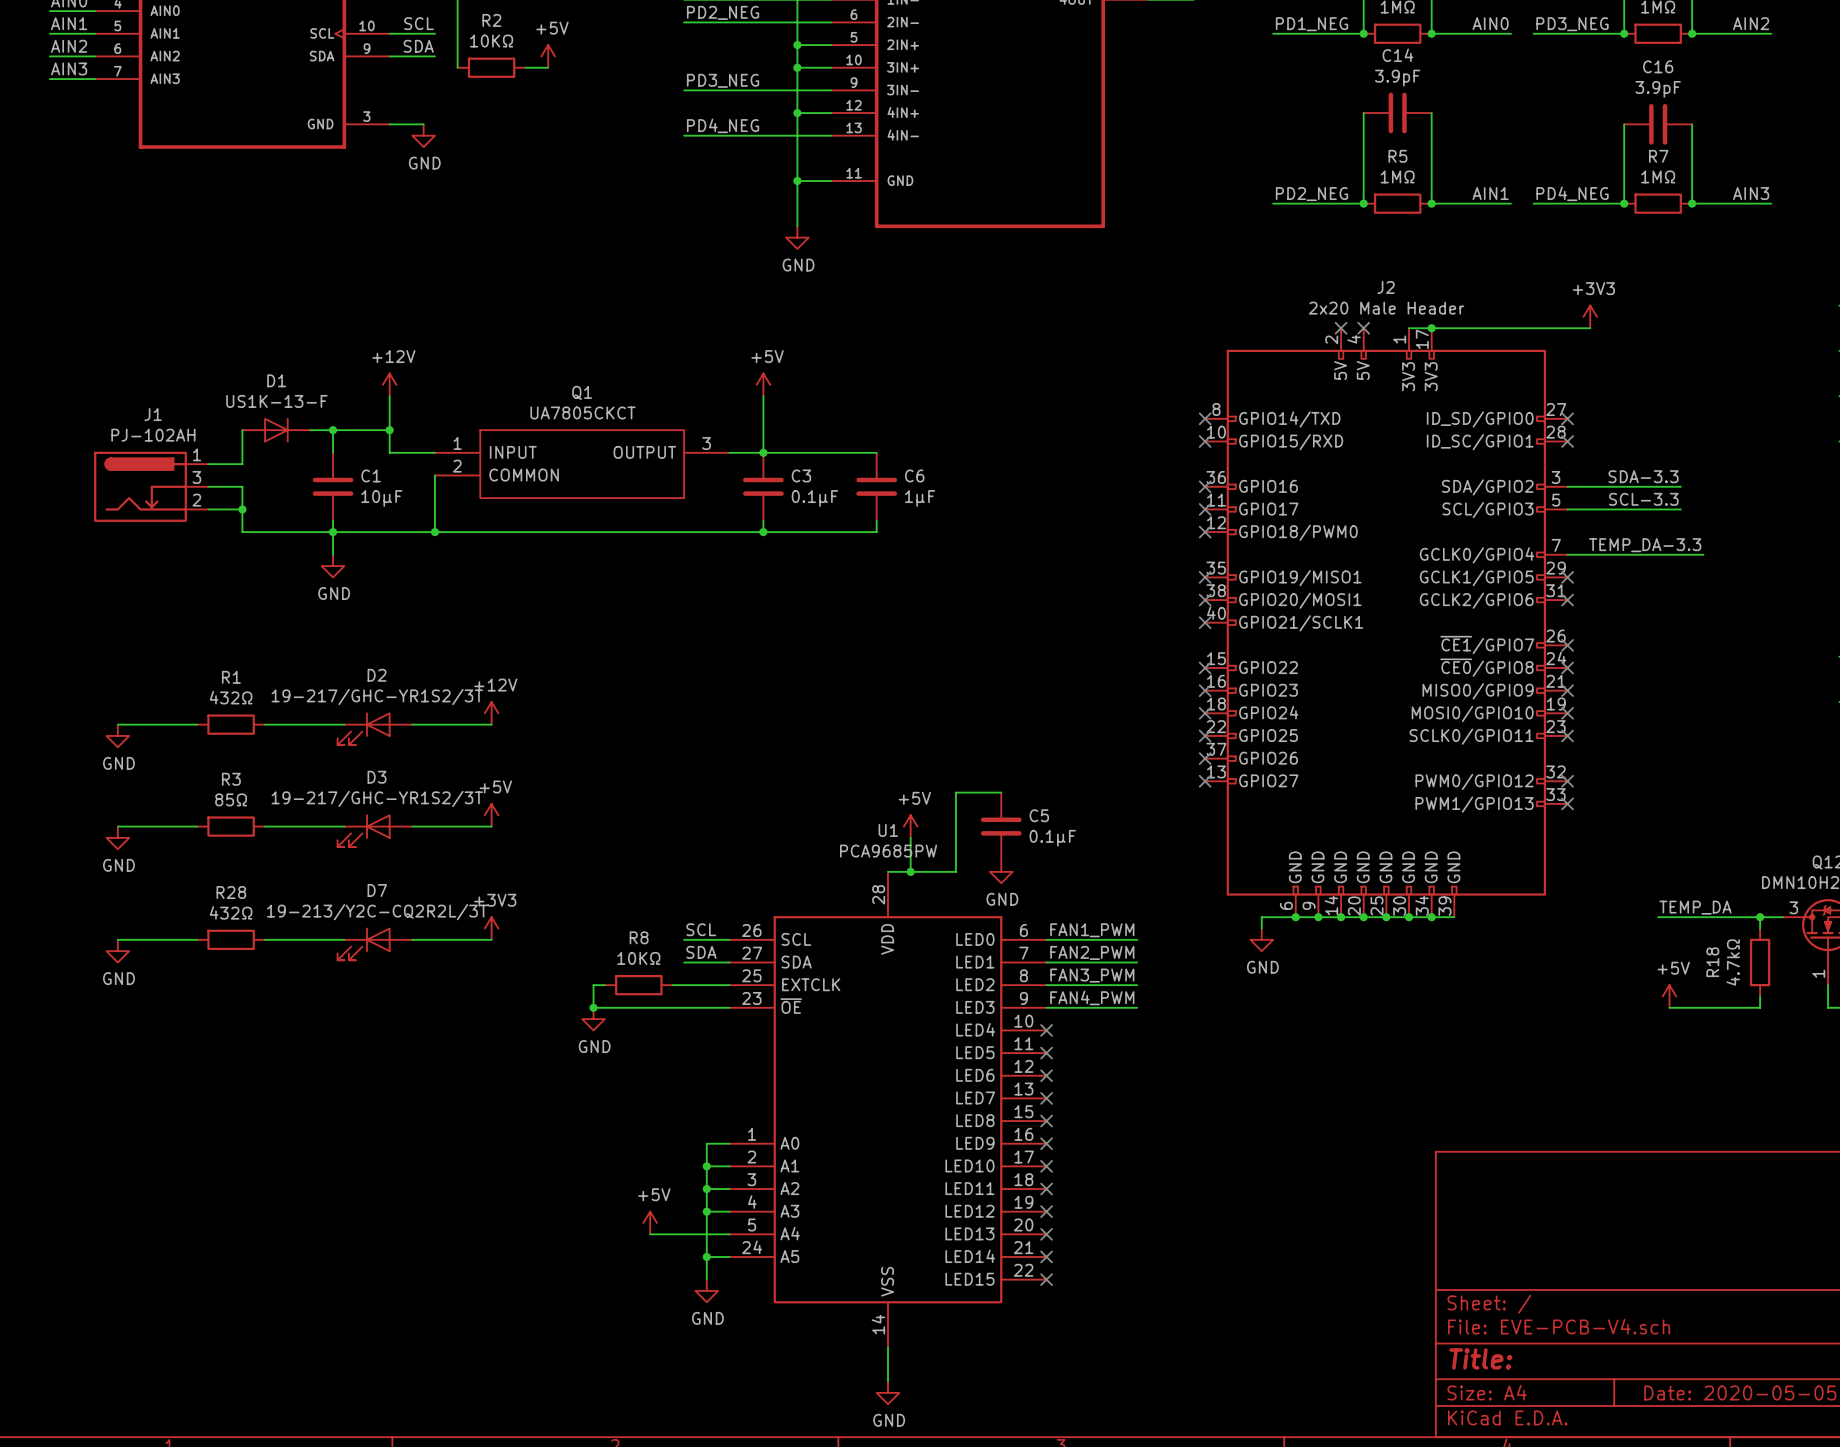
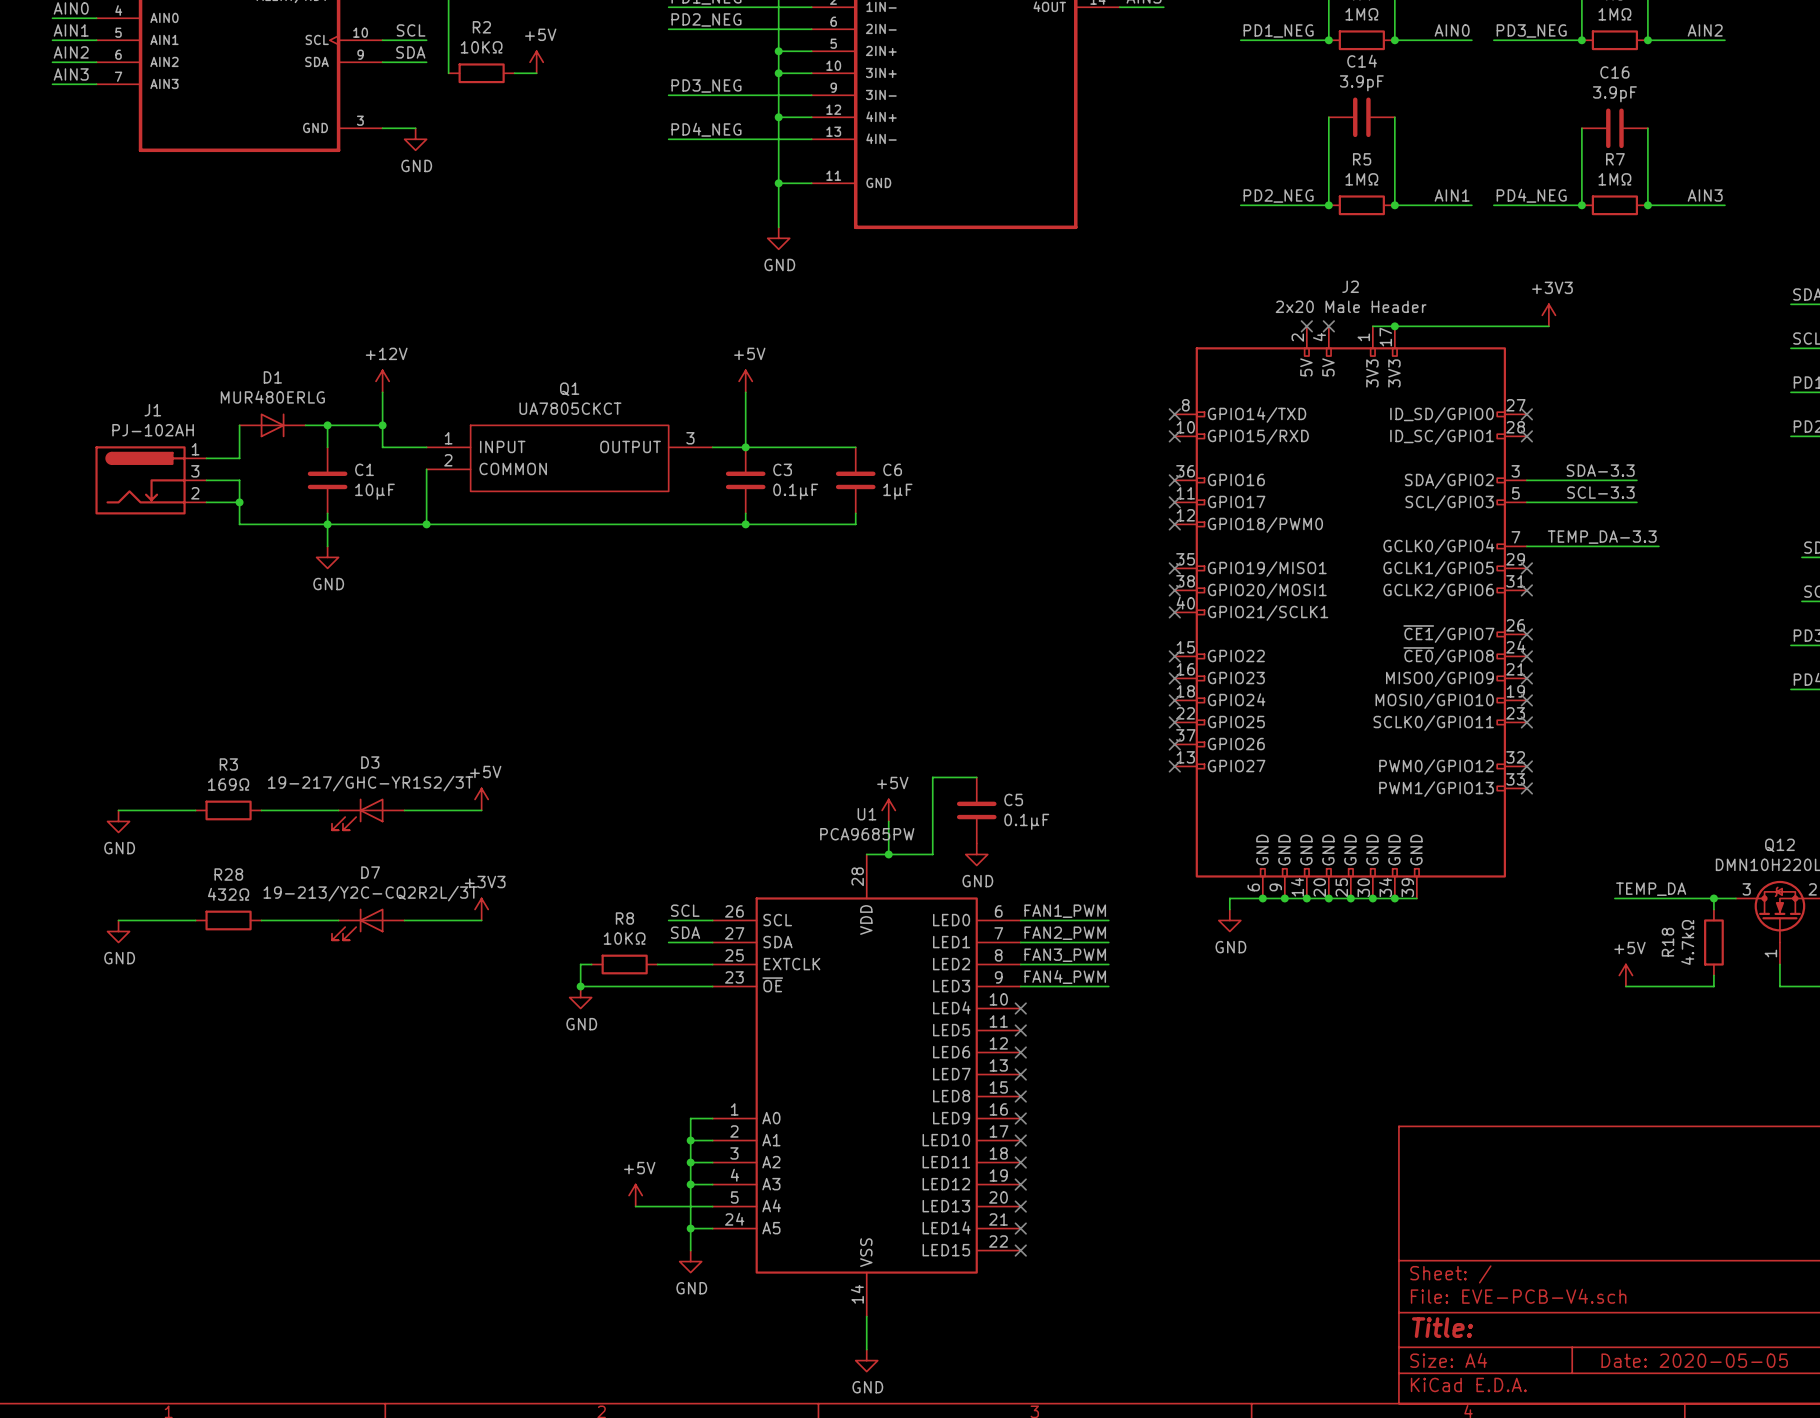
D1 value: US1K-13-F (276, 401) -> MUR480ERLG (272, 397)
power symbol: +12V (491, 713) -> none
wire: (117, 724) (197, 724) -> none
R1: 432Ω (231, 724) -> none
wire: (265, 724) (344, 724) -> none
wire: (412, 724) (491, 724) -> none
D2: 19-217/GHC-YR1S2/3T (374, 728) -> none
power symbol: GND (117, 735) -> none
R3 value: 85Ω (231, 799) -> 169Ω (228, 784)

